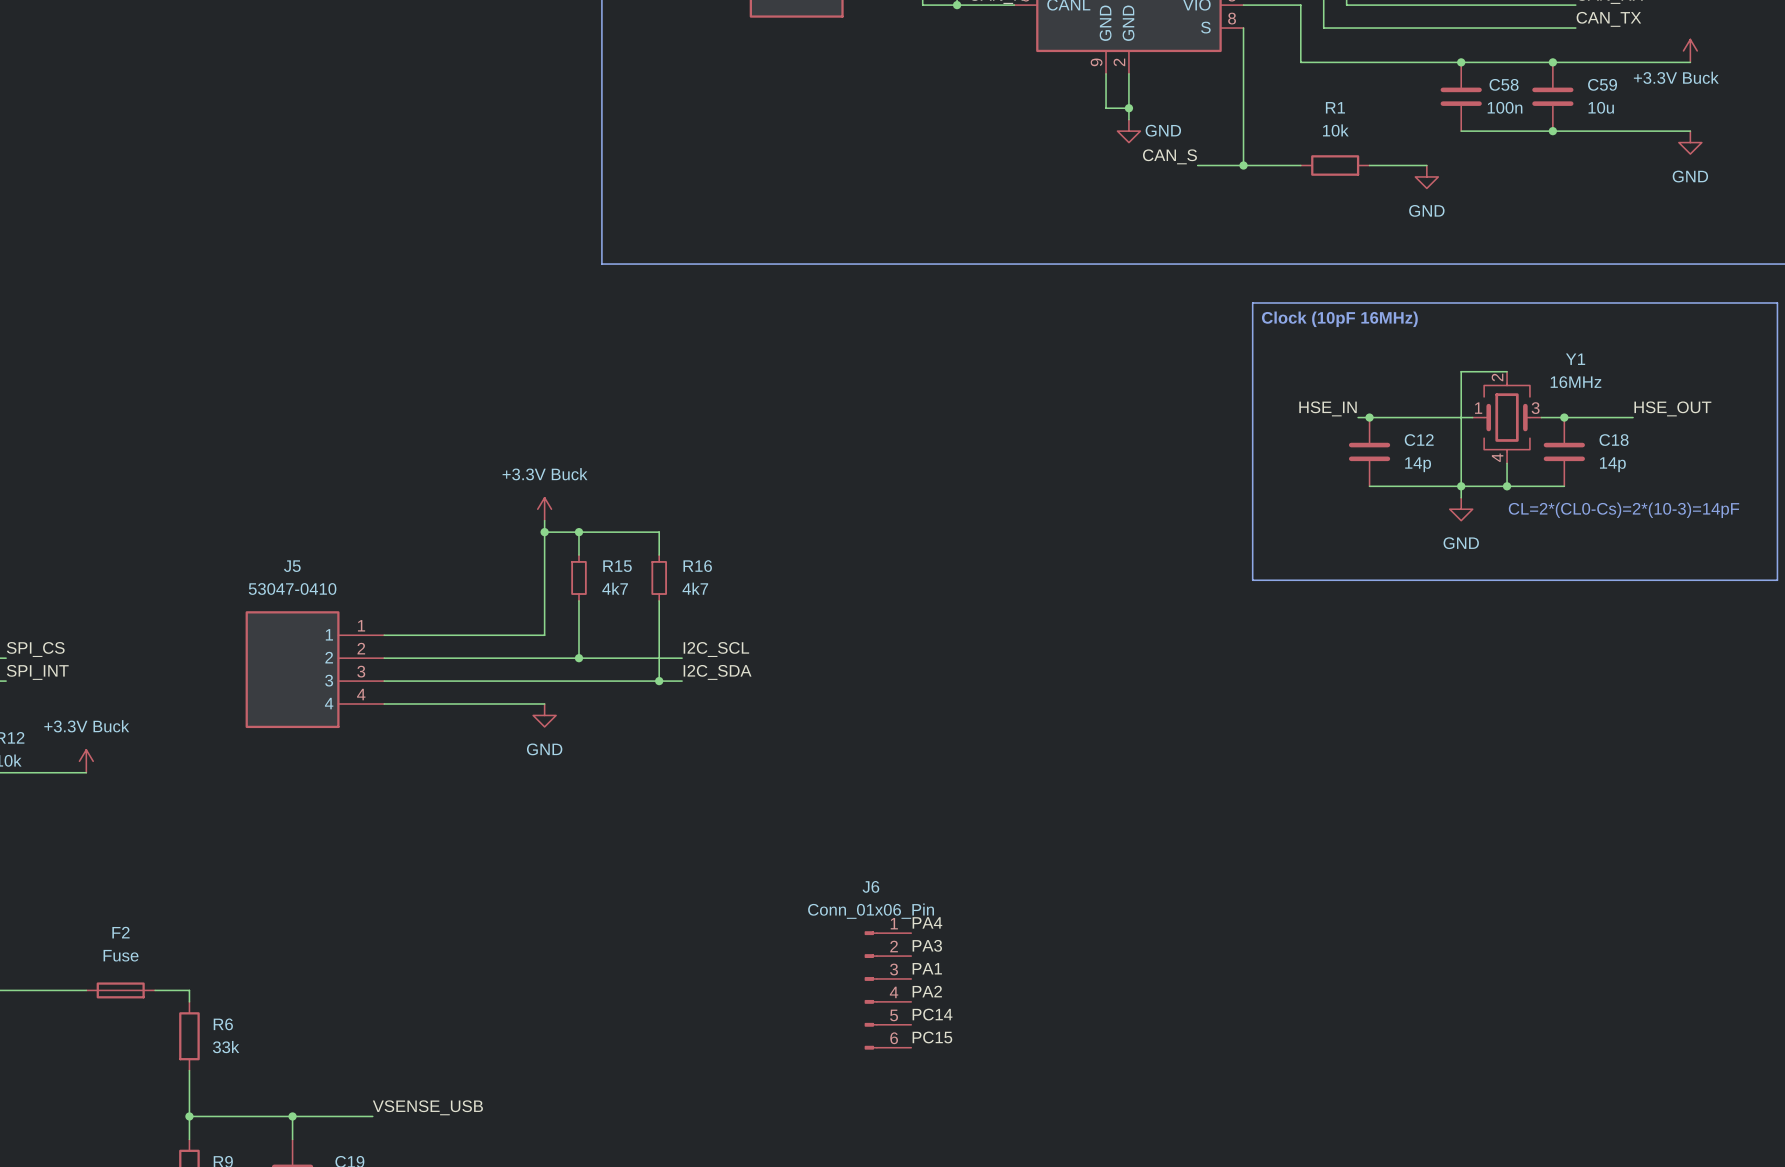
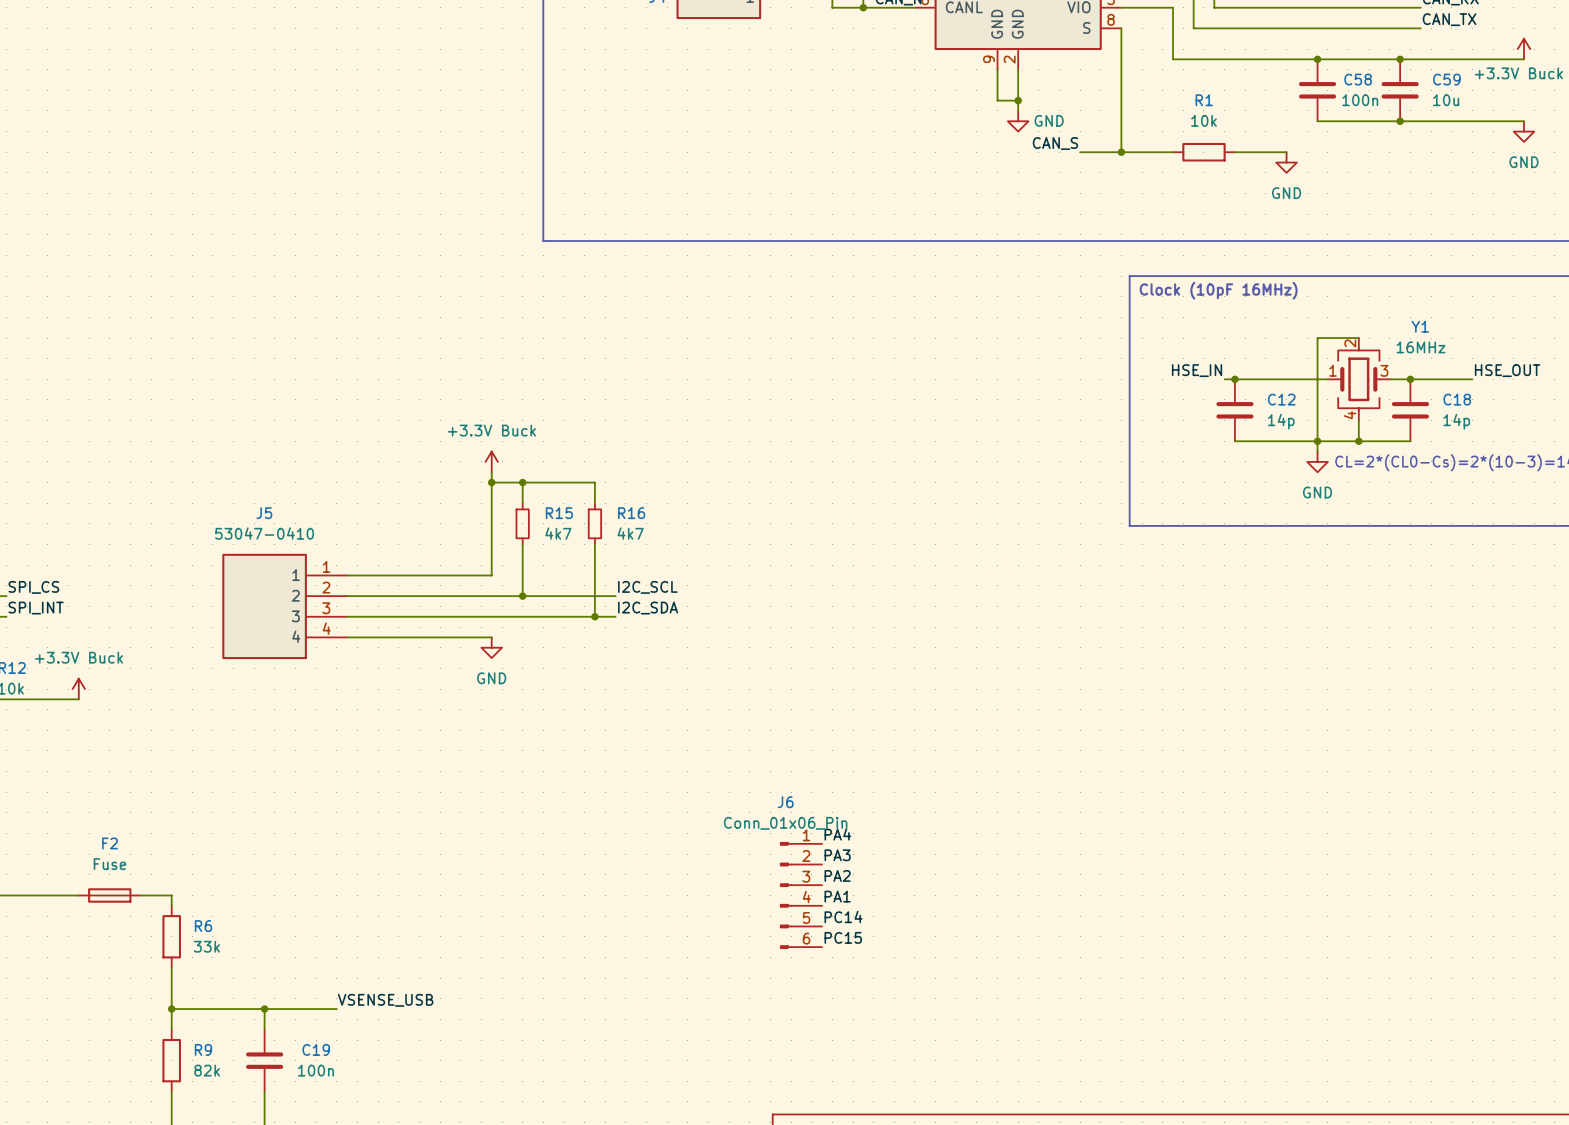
label: PA1 (927, 968) -> PA2 (837, 875)
label: PA2 (927, 991) -> PA1 (837, 896)

